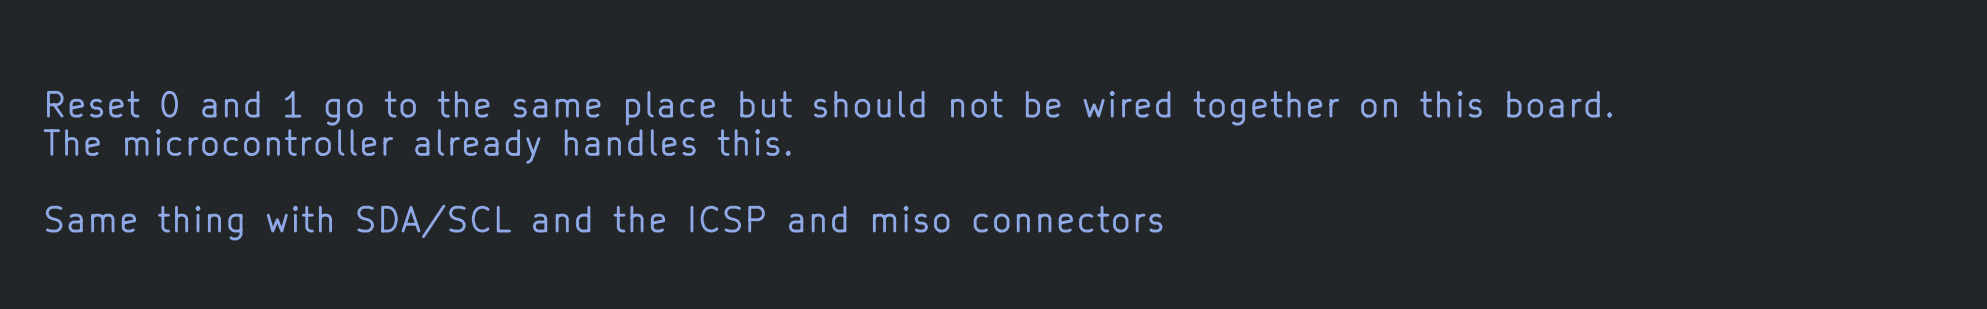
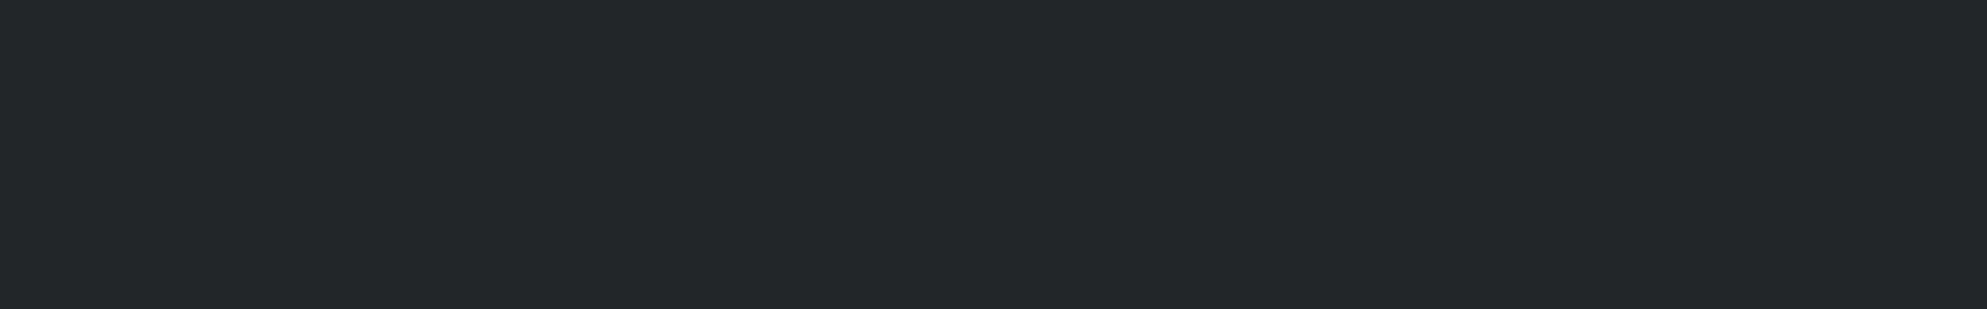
text: Reset 0 and 1 go to the same place but should not be wired together on this board. (829, 108) -> none
text: The microcontroller already handles this. (417, 146) -> none
text: Same thing with SDA/SCL and the ICSP and miso connectors (604, 222) -> none

